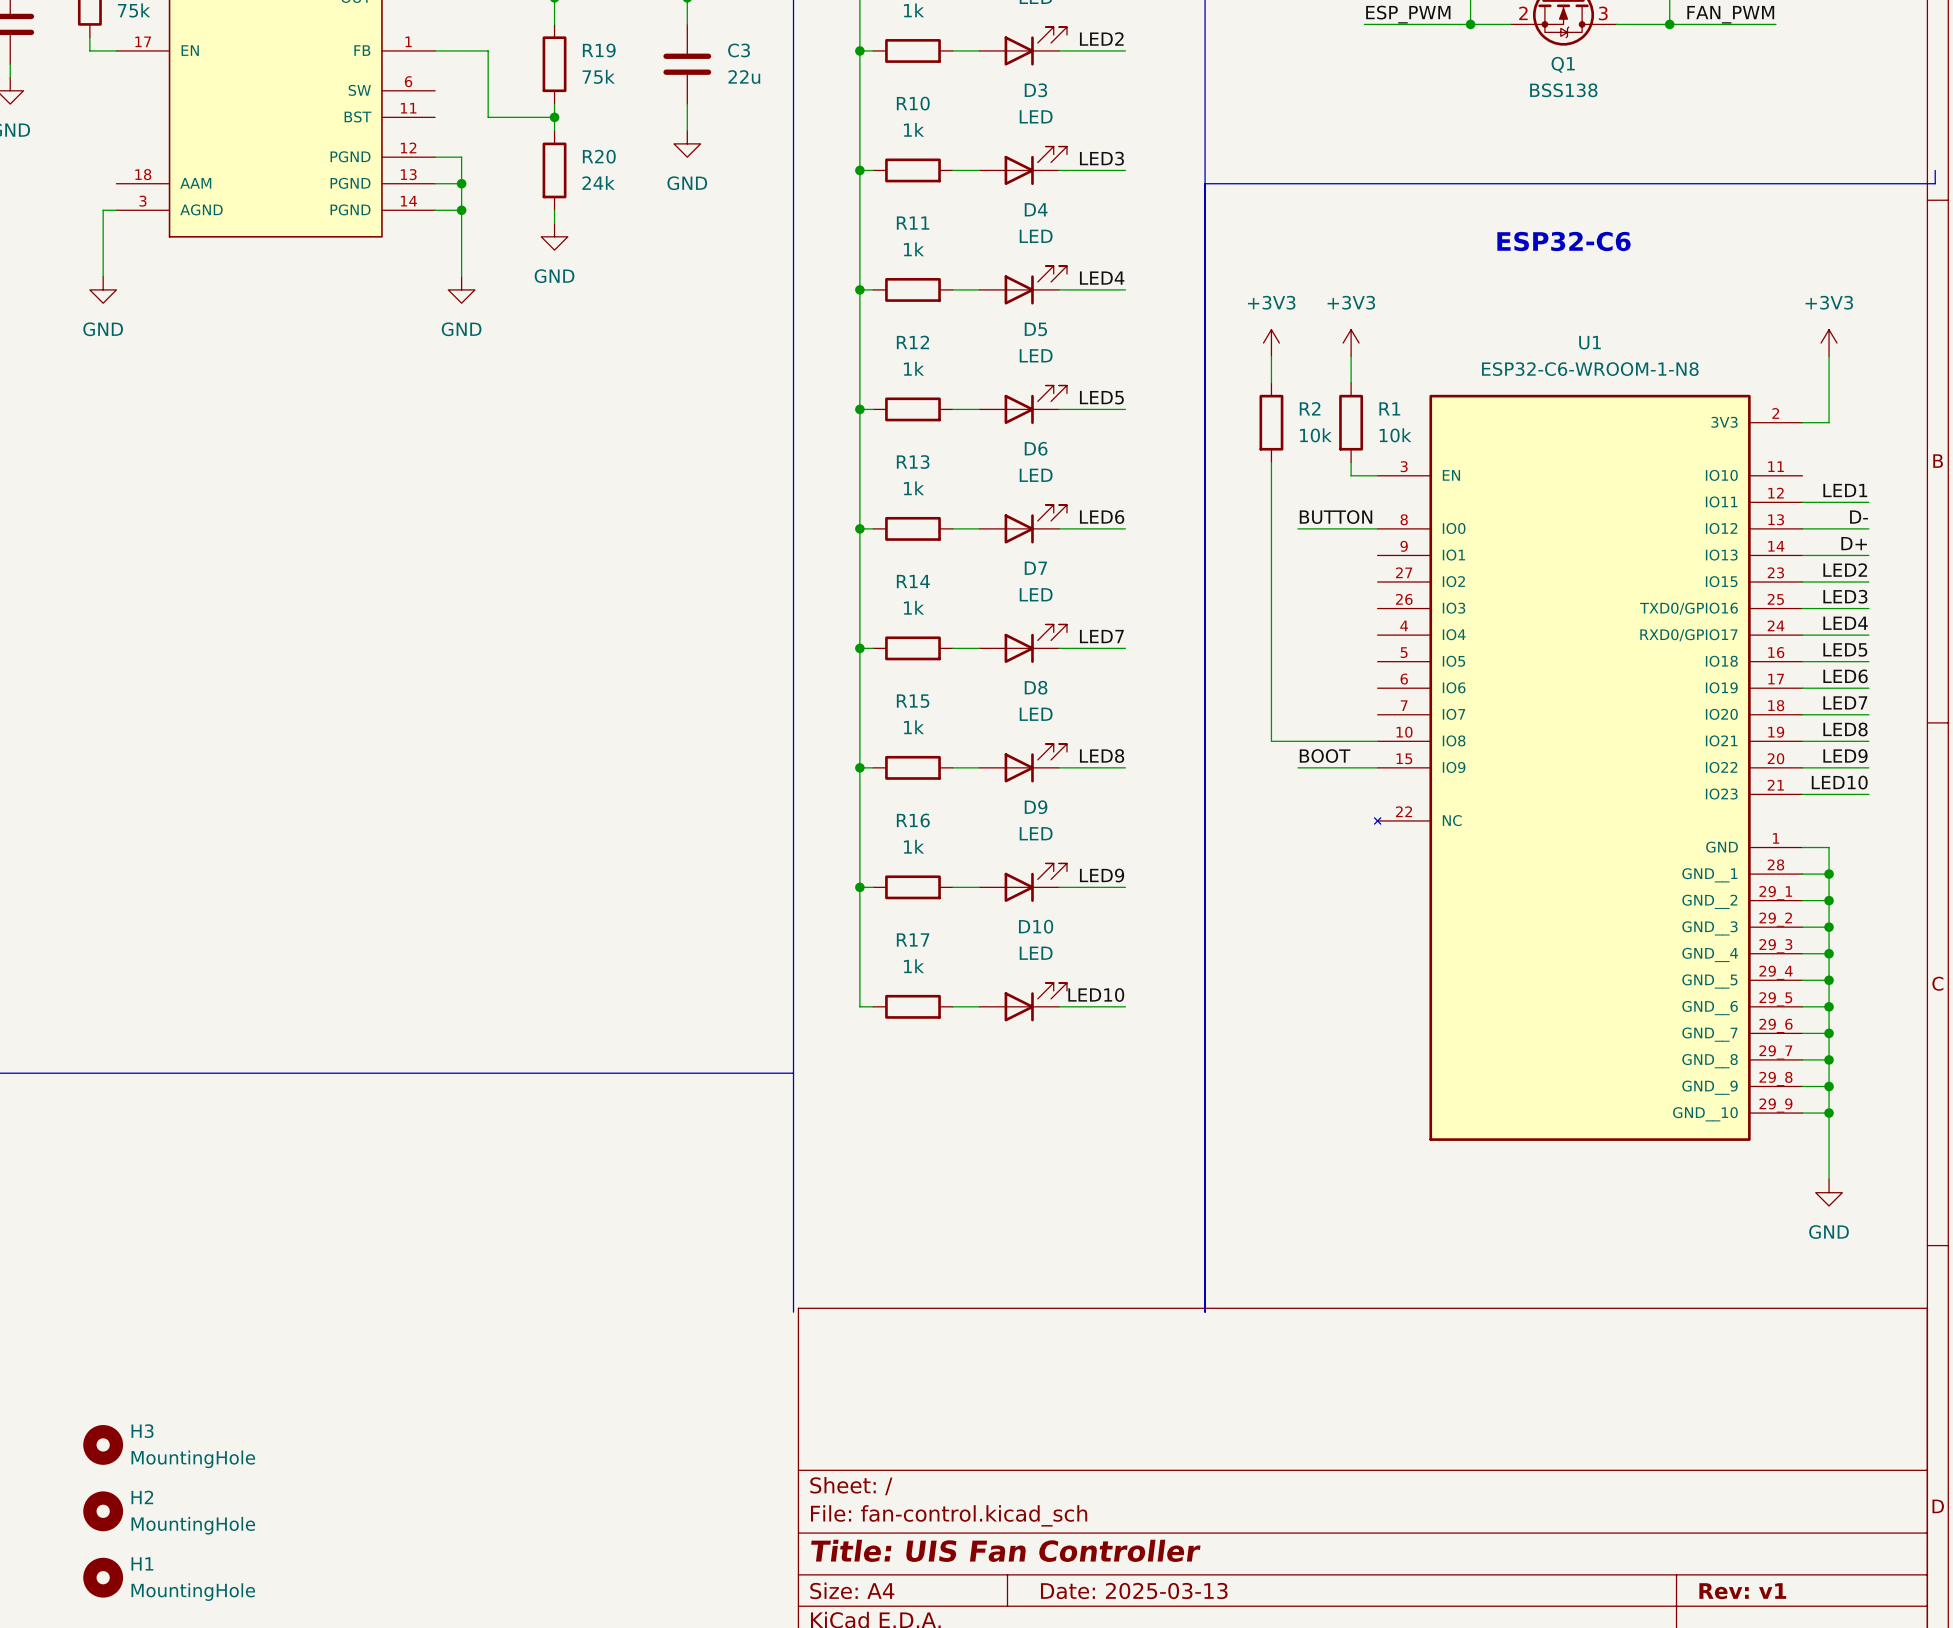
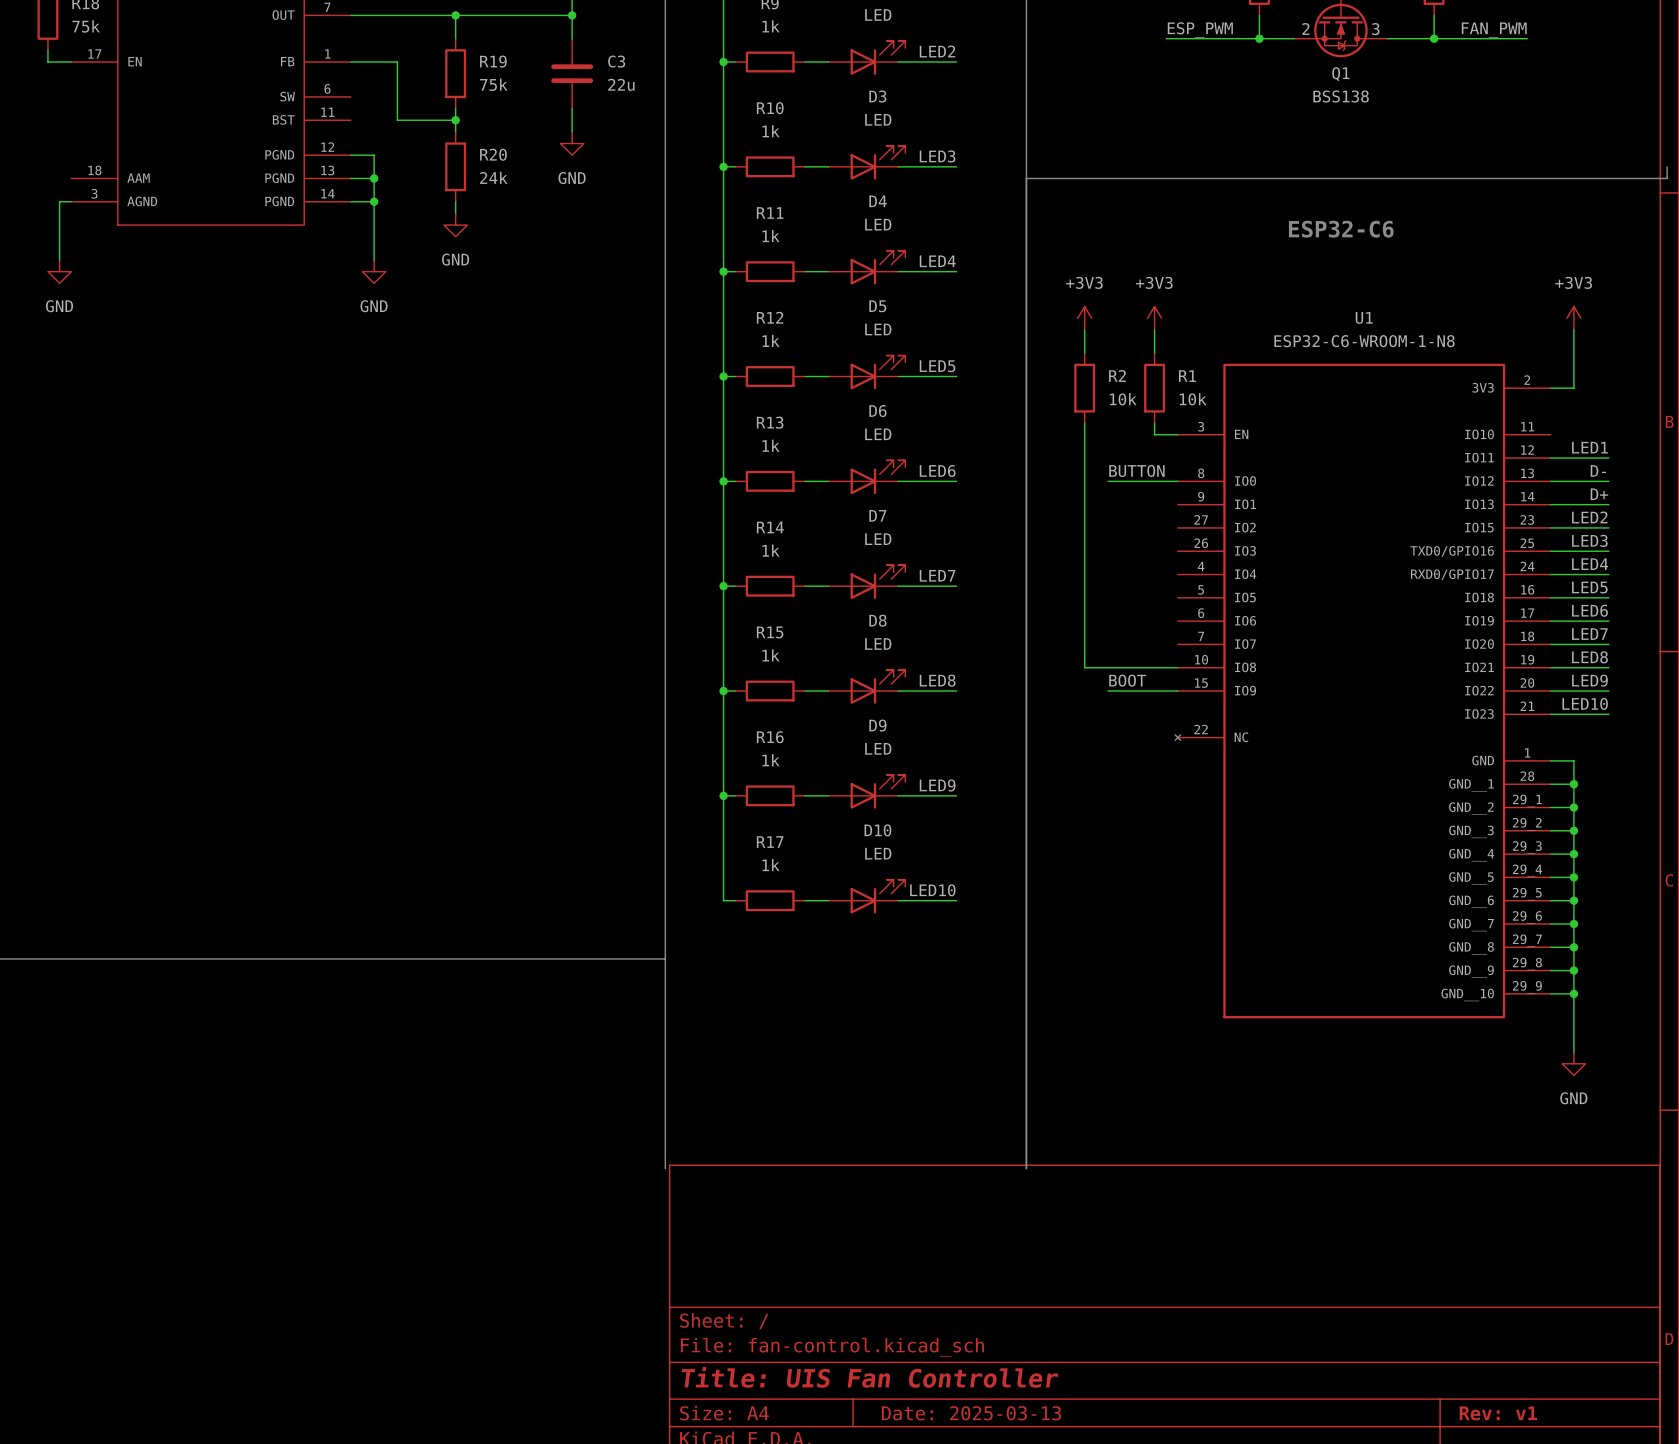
H3: MountingHole (103, 1444) -> none
H2: MountingHole (103, 1511) -> none
H1: MountingHole (103, 1577) -> none

